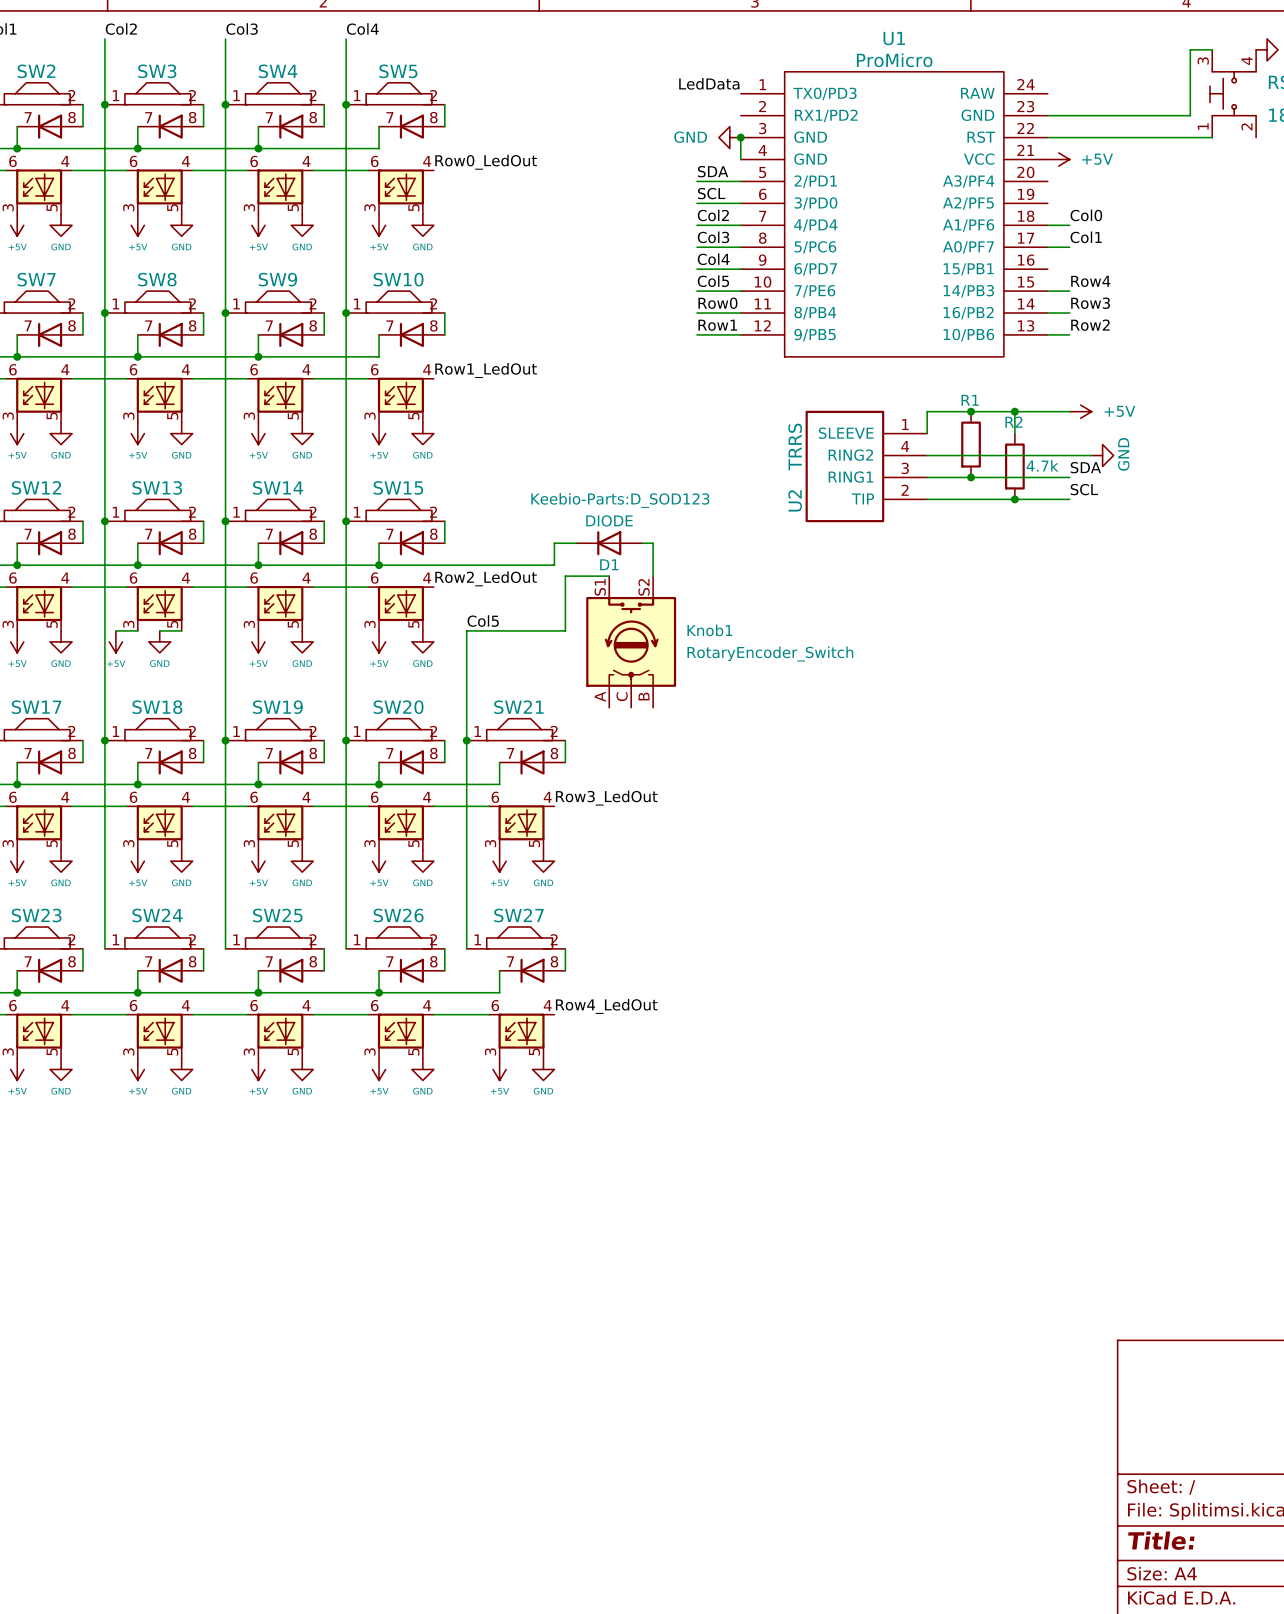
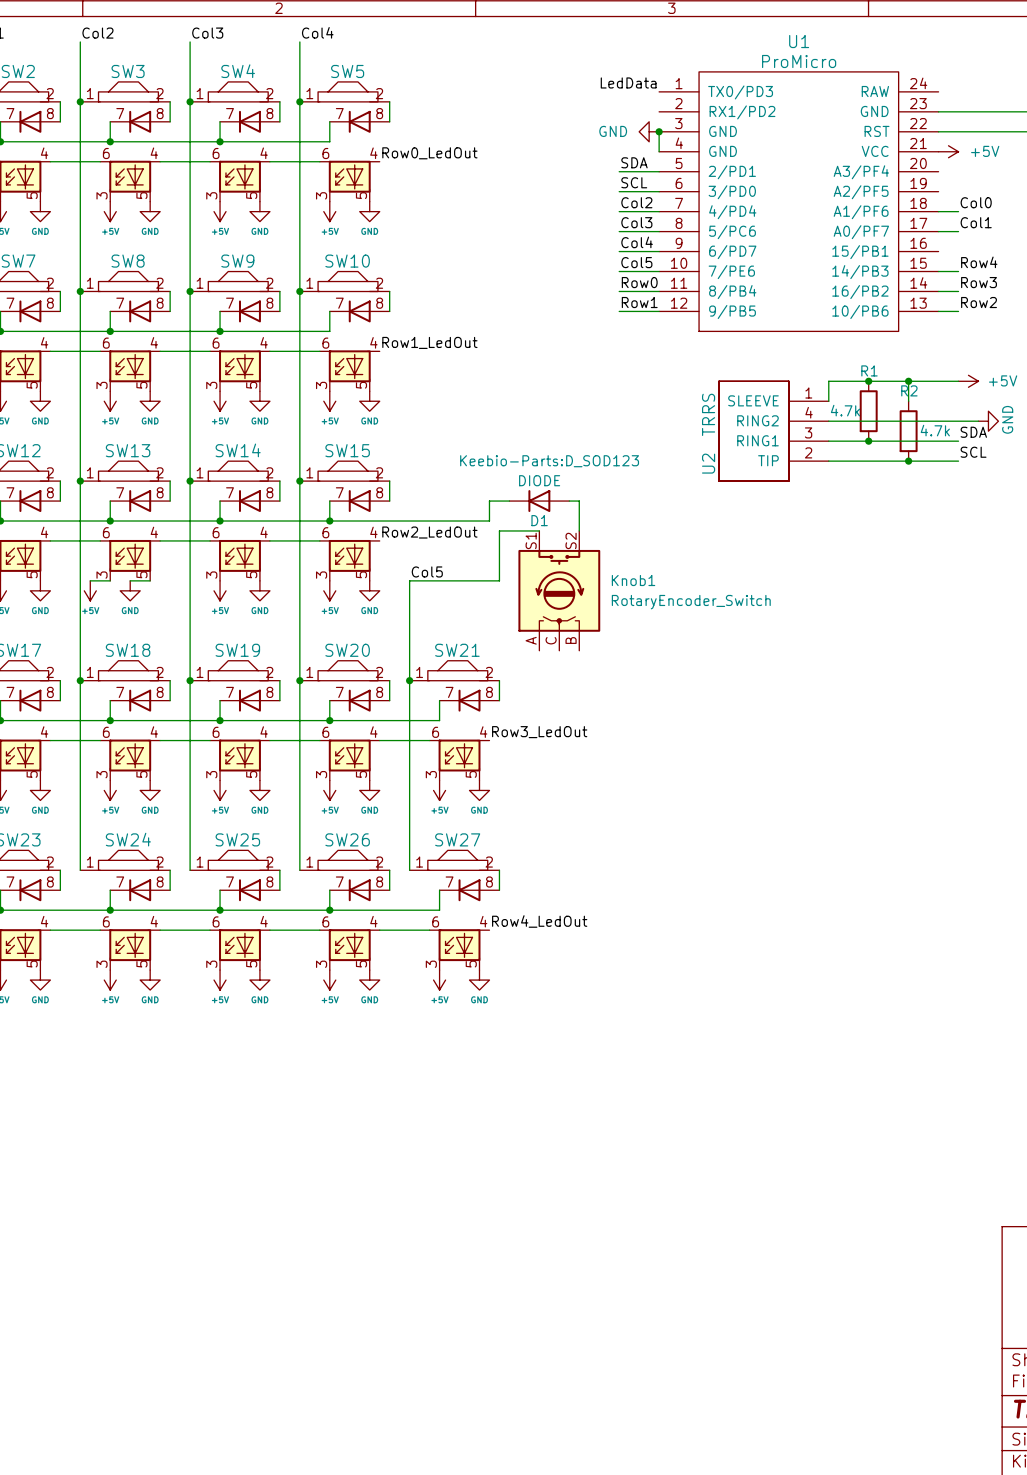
R1 value: none -> 4.7k (845, 410)

